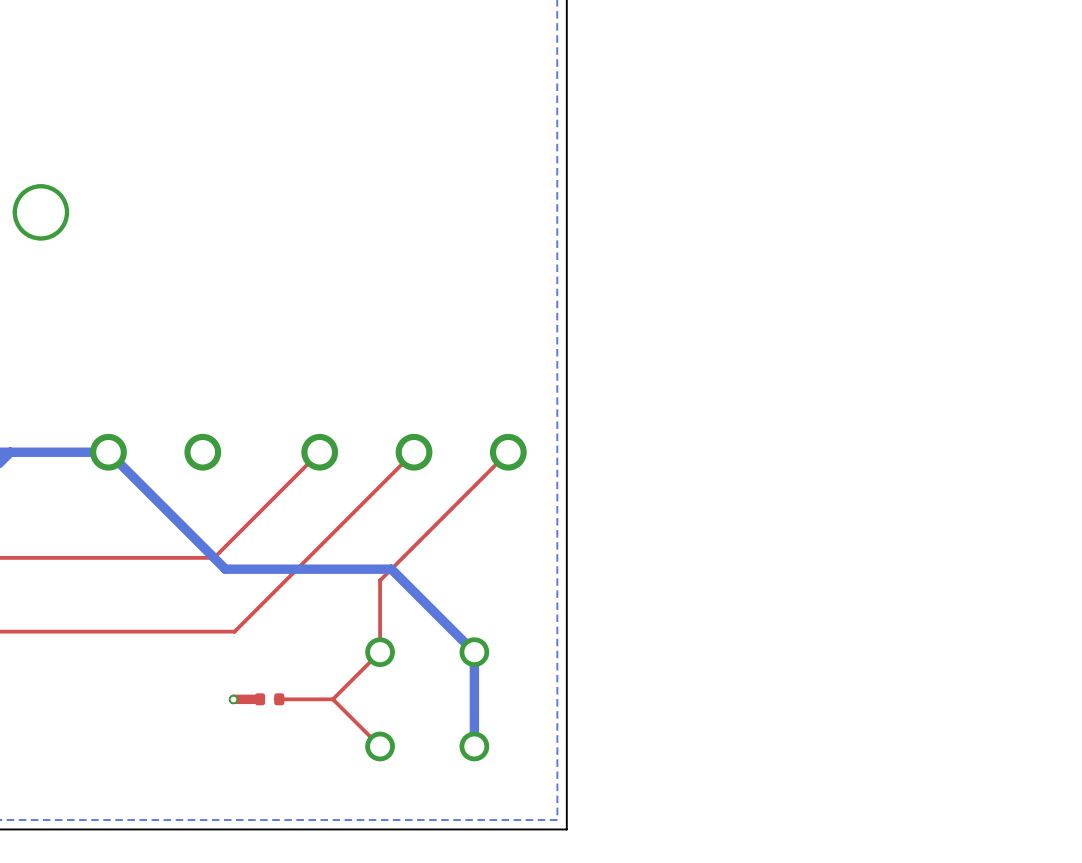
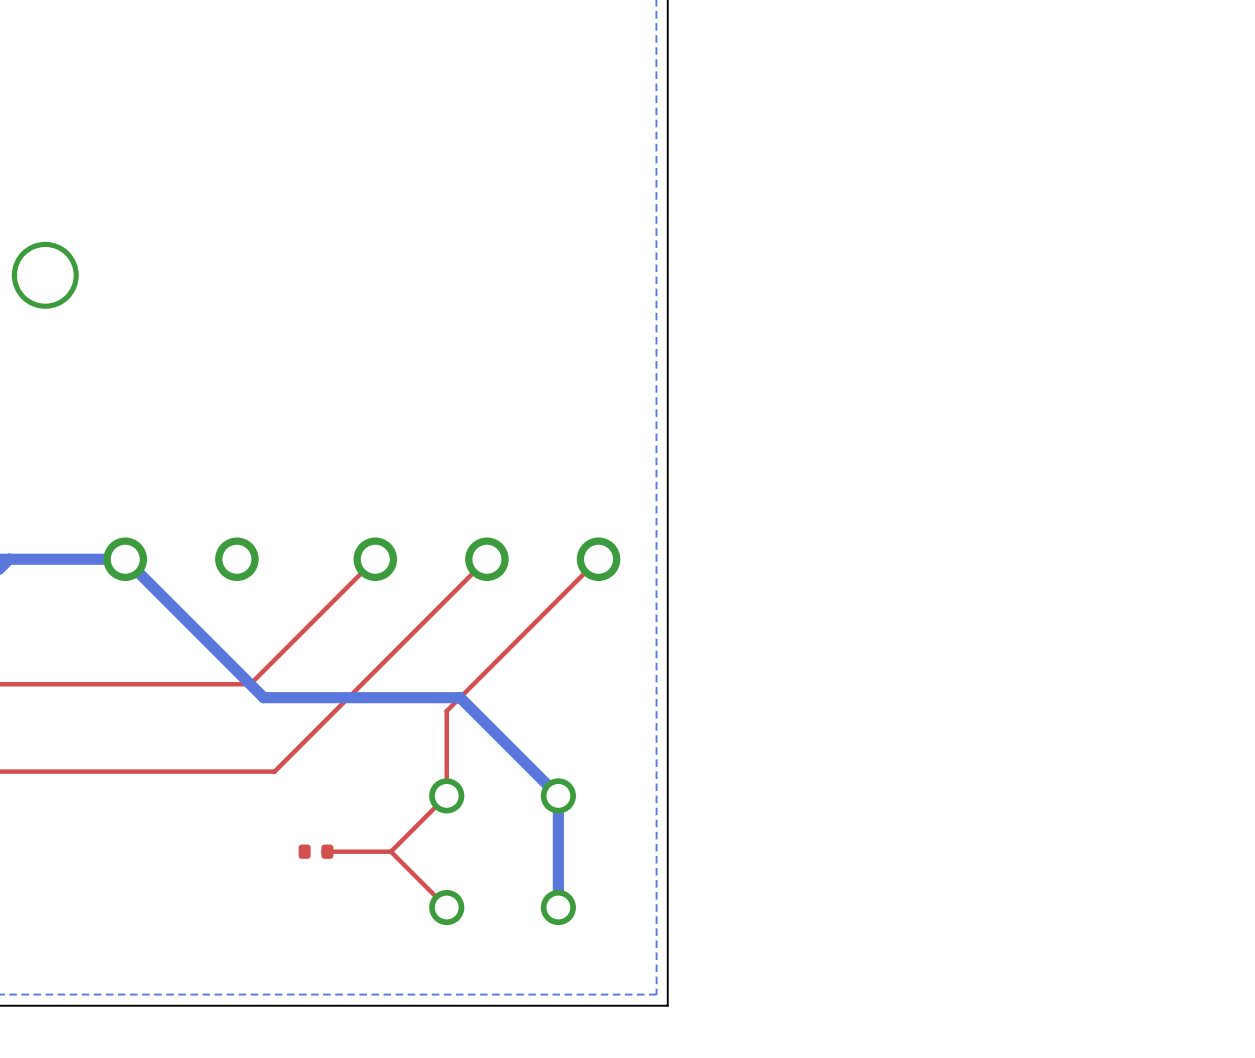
via: (233, 699) -> none
top track: (260, 699) (233, 699) -> none

